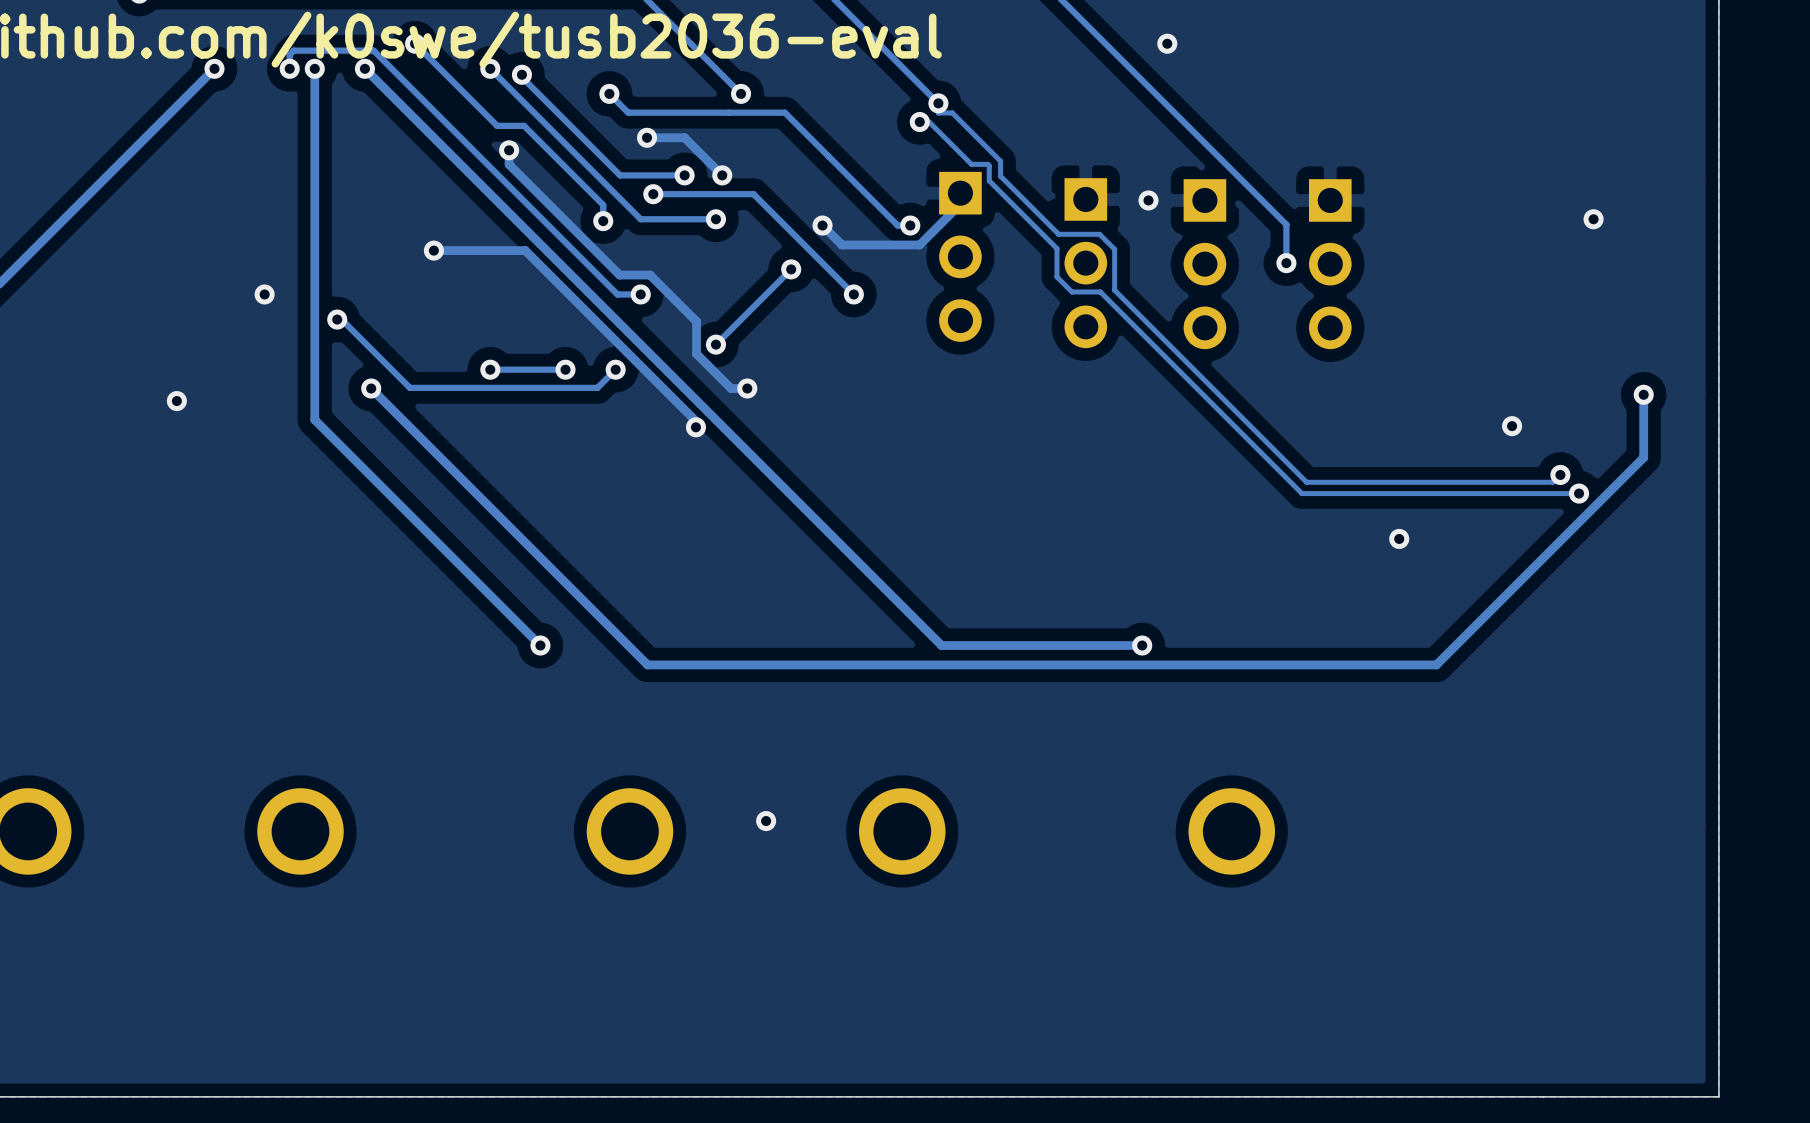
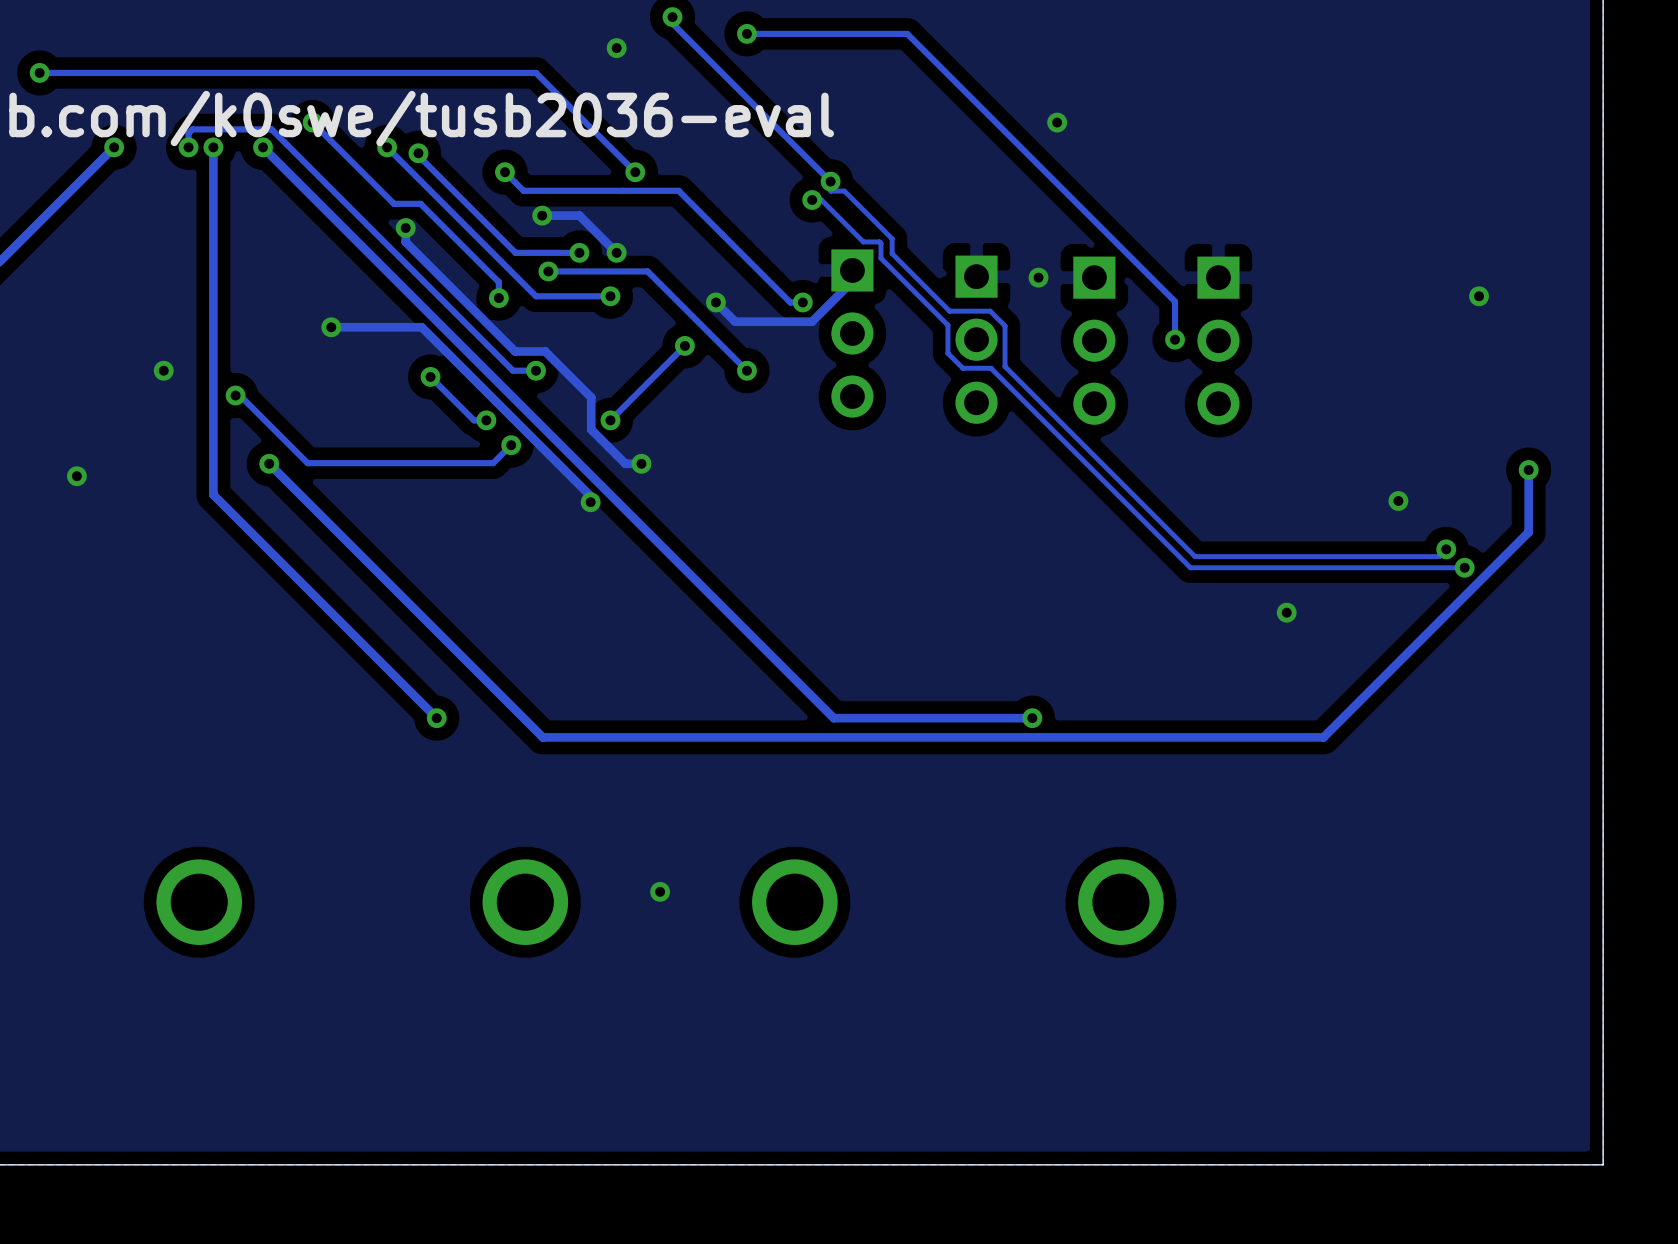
track: none -> (430, 376) (473, 420) (486, 420)
via: none -> (430, 376)
via: (490, 369) -> none
track: (565, 369) (490, 369) -> none
via position: (565, 369) -> (486, 420)

